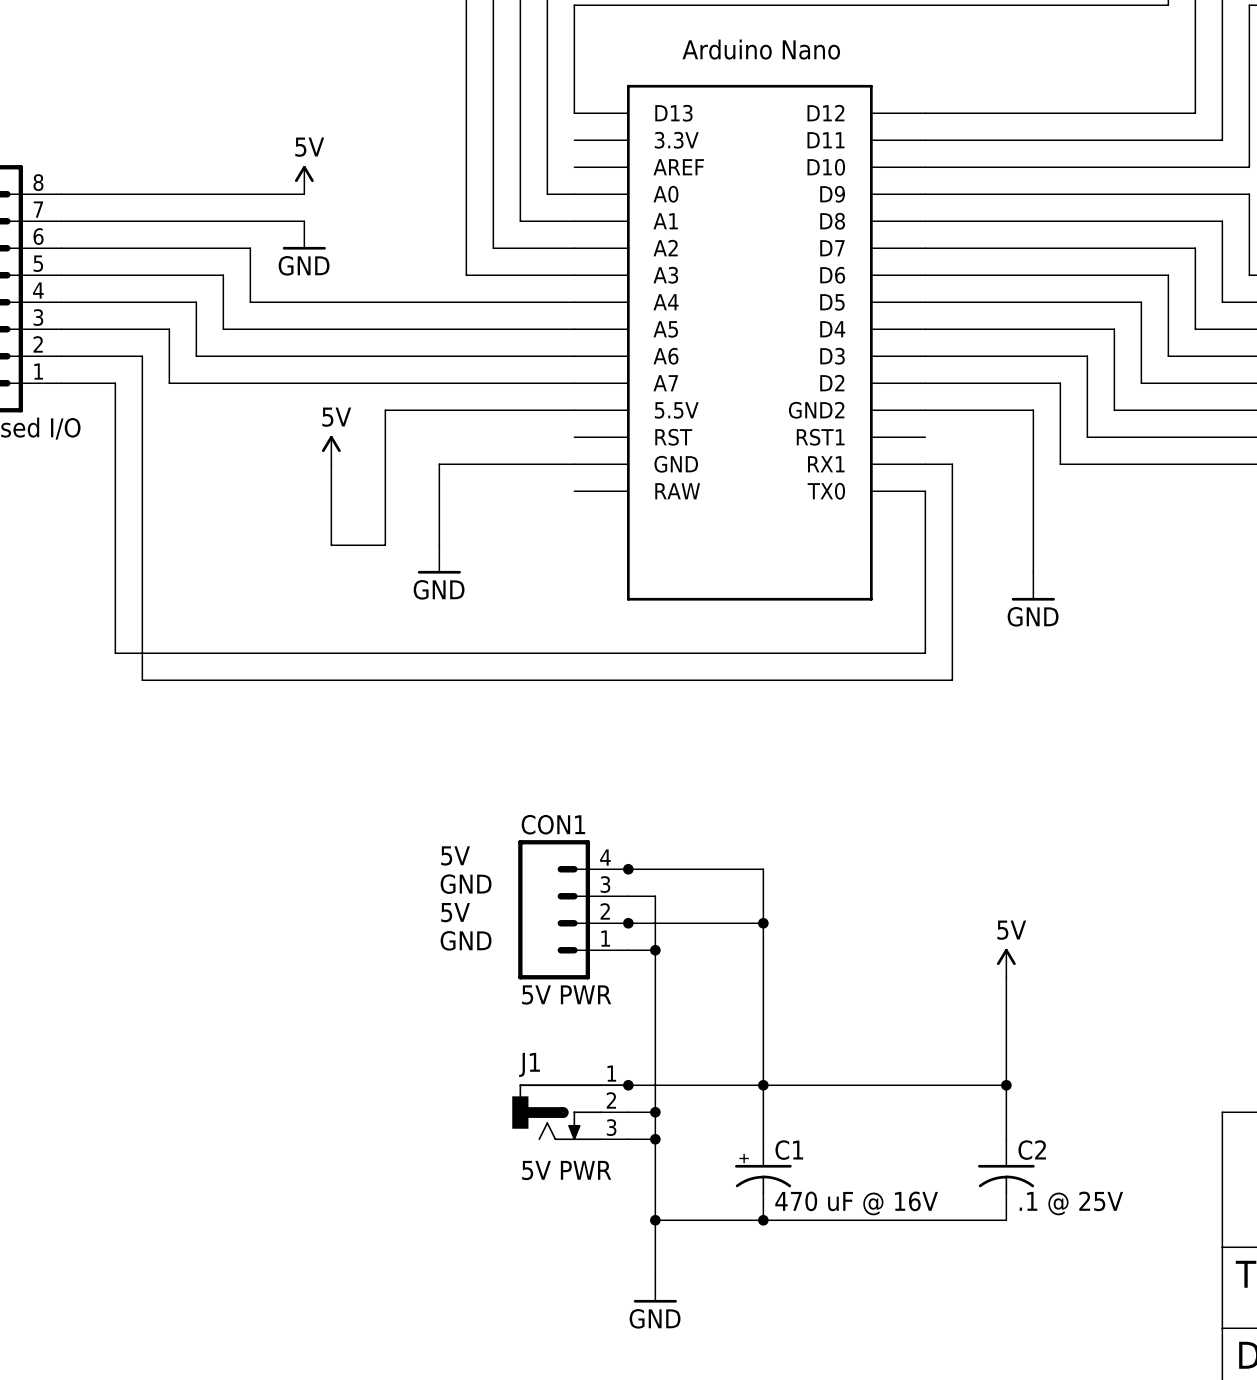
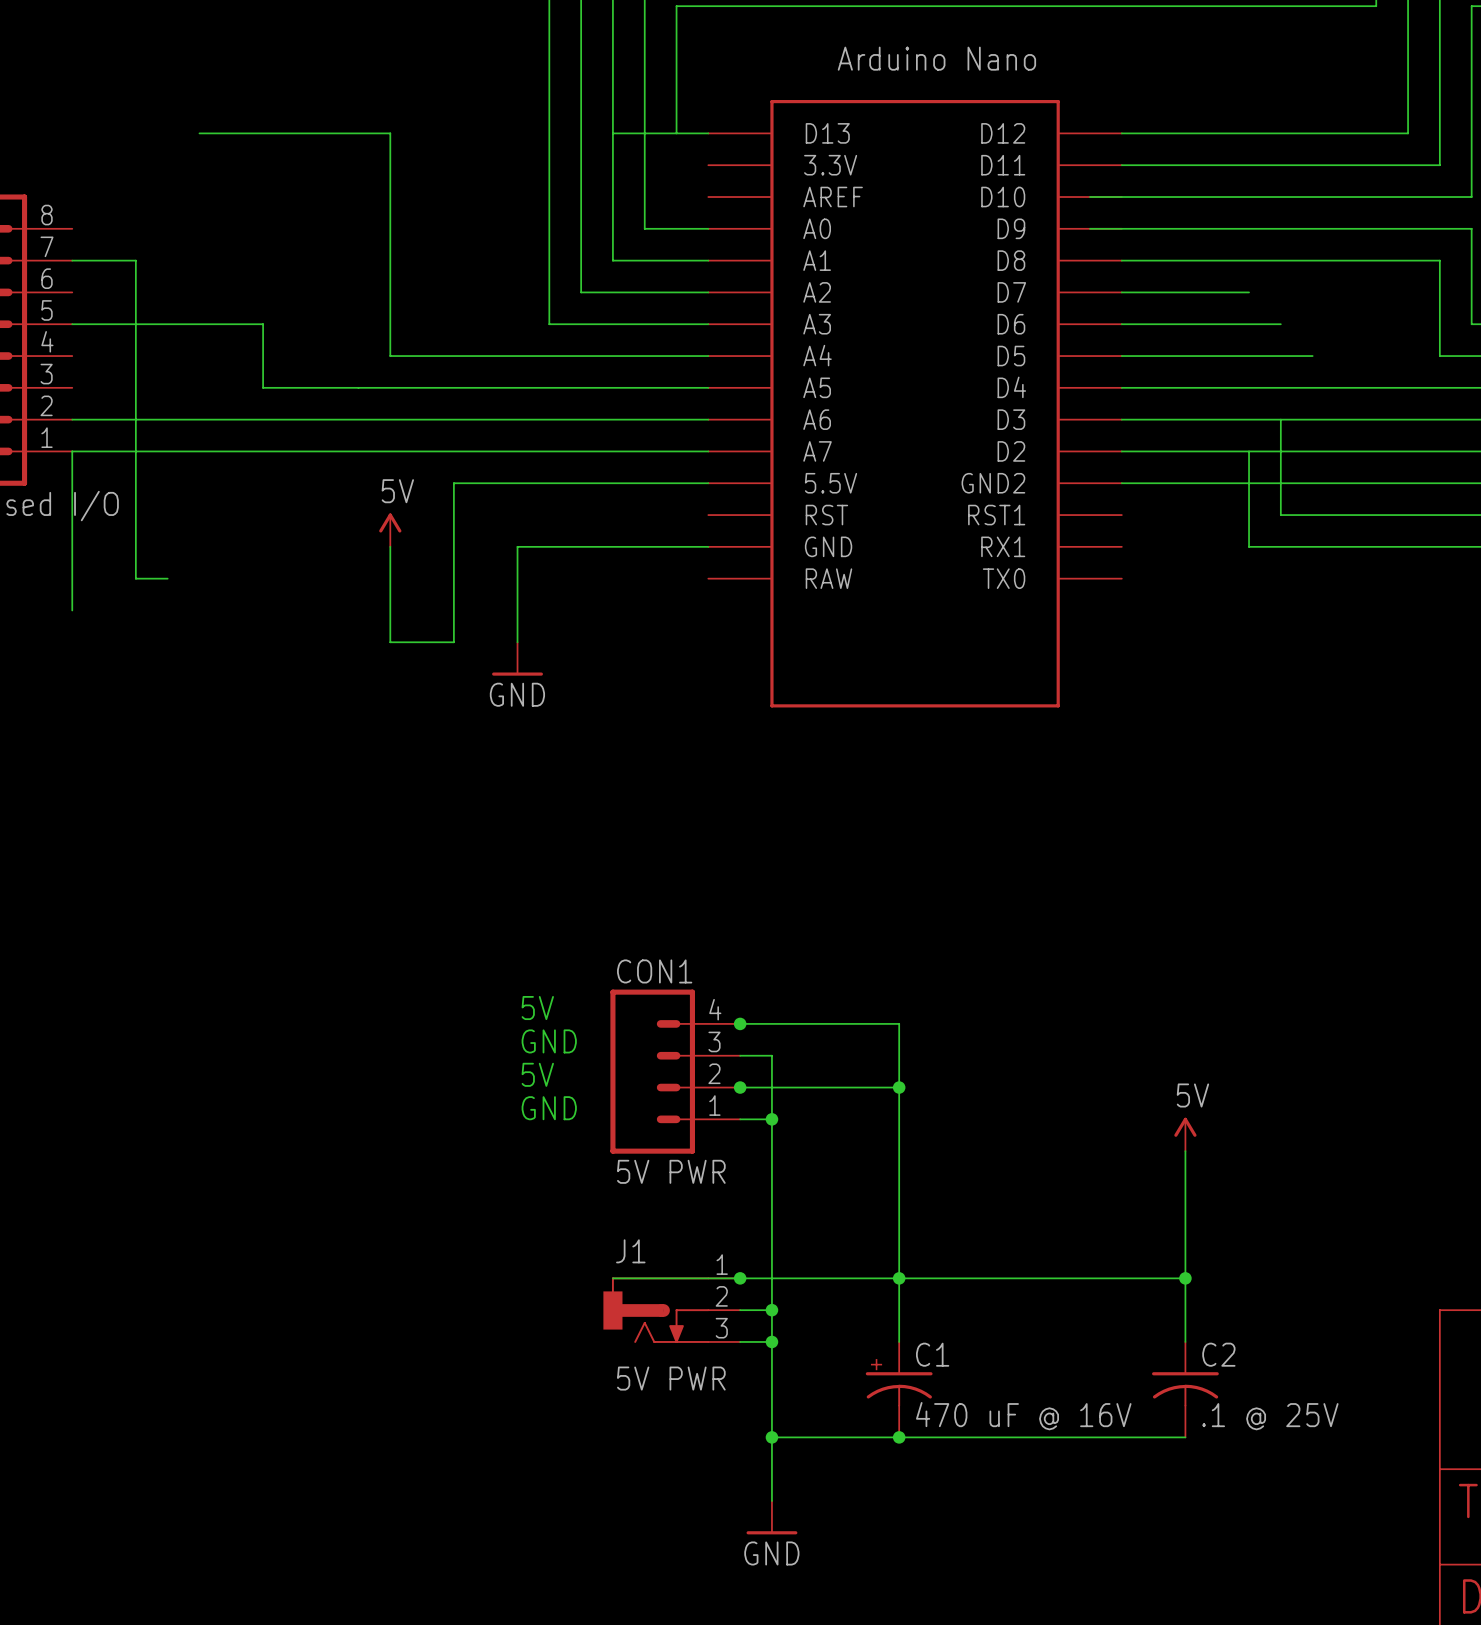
wire: none -> (612, 133) (708, 133)
power symbol: 5V (304, 180) -> none
wire: (61, 194) (304, 194) -> none
wire: (115, 221) (304, 221) -> none
power symbol: GND (304, 235) -> none
wire: (61, 248) (250, 248) (250, 302) (331, 302) -> (199, 133) (390, 133) (390, 356)
wire: (1060, 248) (1195, 248) (1195, 329) -> (1312, 387) (1408, 387)
wire: (1087, 275) (1168, 275) (1168, 356) -> (1280, 419) (1376, 419)
wire: (61, 302) (196, 302) (196, 356) -> (167, 419) (231, 419)
wire: (1114, 302) (1141, 302) (1141, 383) -> (1249, 451) (1344, 451)
wire: (61, 329) (169, 329) (169, 383) -> (135, 260) (135, 451) (199, 451)
wire: (1114, 329) (1114, 410) -> (1217, 483) (1312, 483)
part position: (749, 342) -> (915, 403)
wire: (142, 356) (142, 680) (952, 680) (952, 464) (925, 464) -> none
wire: none -> (72, 451) (72, 610)
wire: (1033, 410) (1033, 572) -> none
wire: (115, 491) (115, 653) (925, 653) (925, 491) -> (135, 578) (167, 578)
power symbol: GND (1033, 586) -> none

